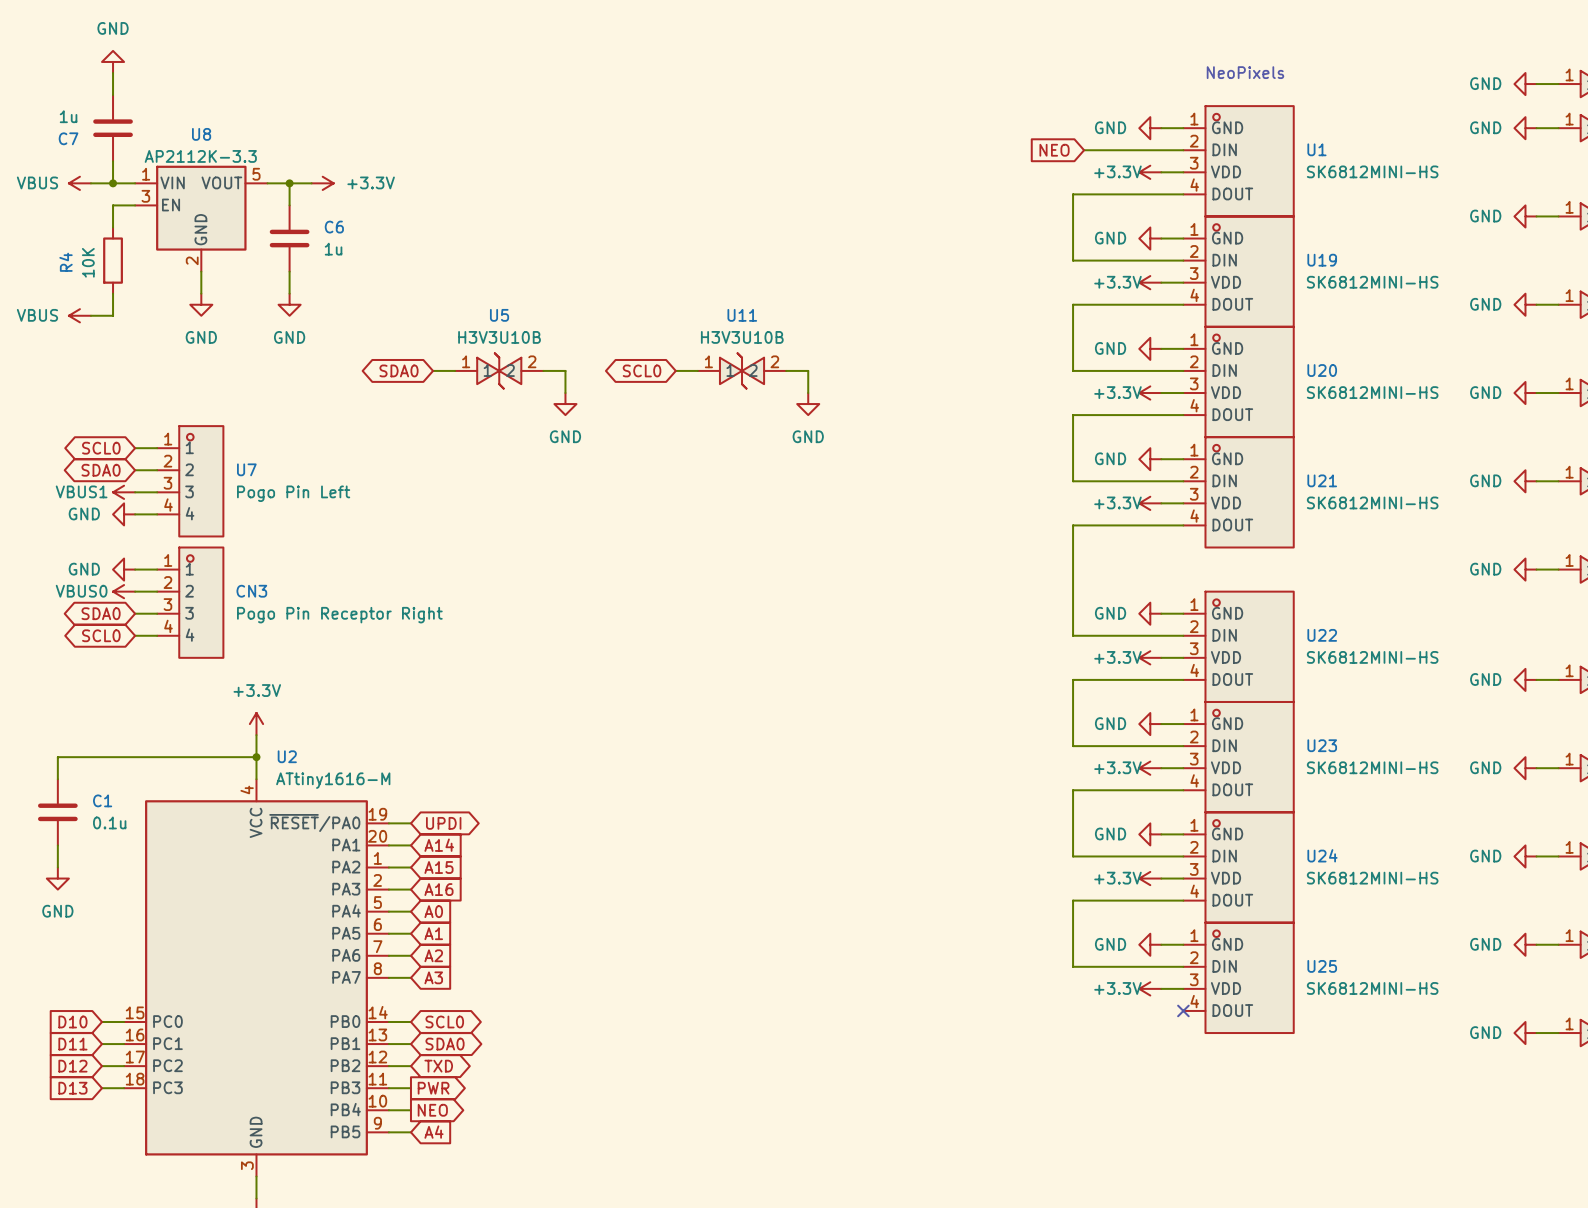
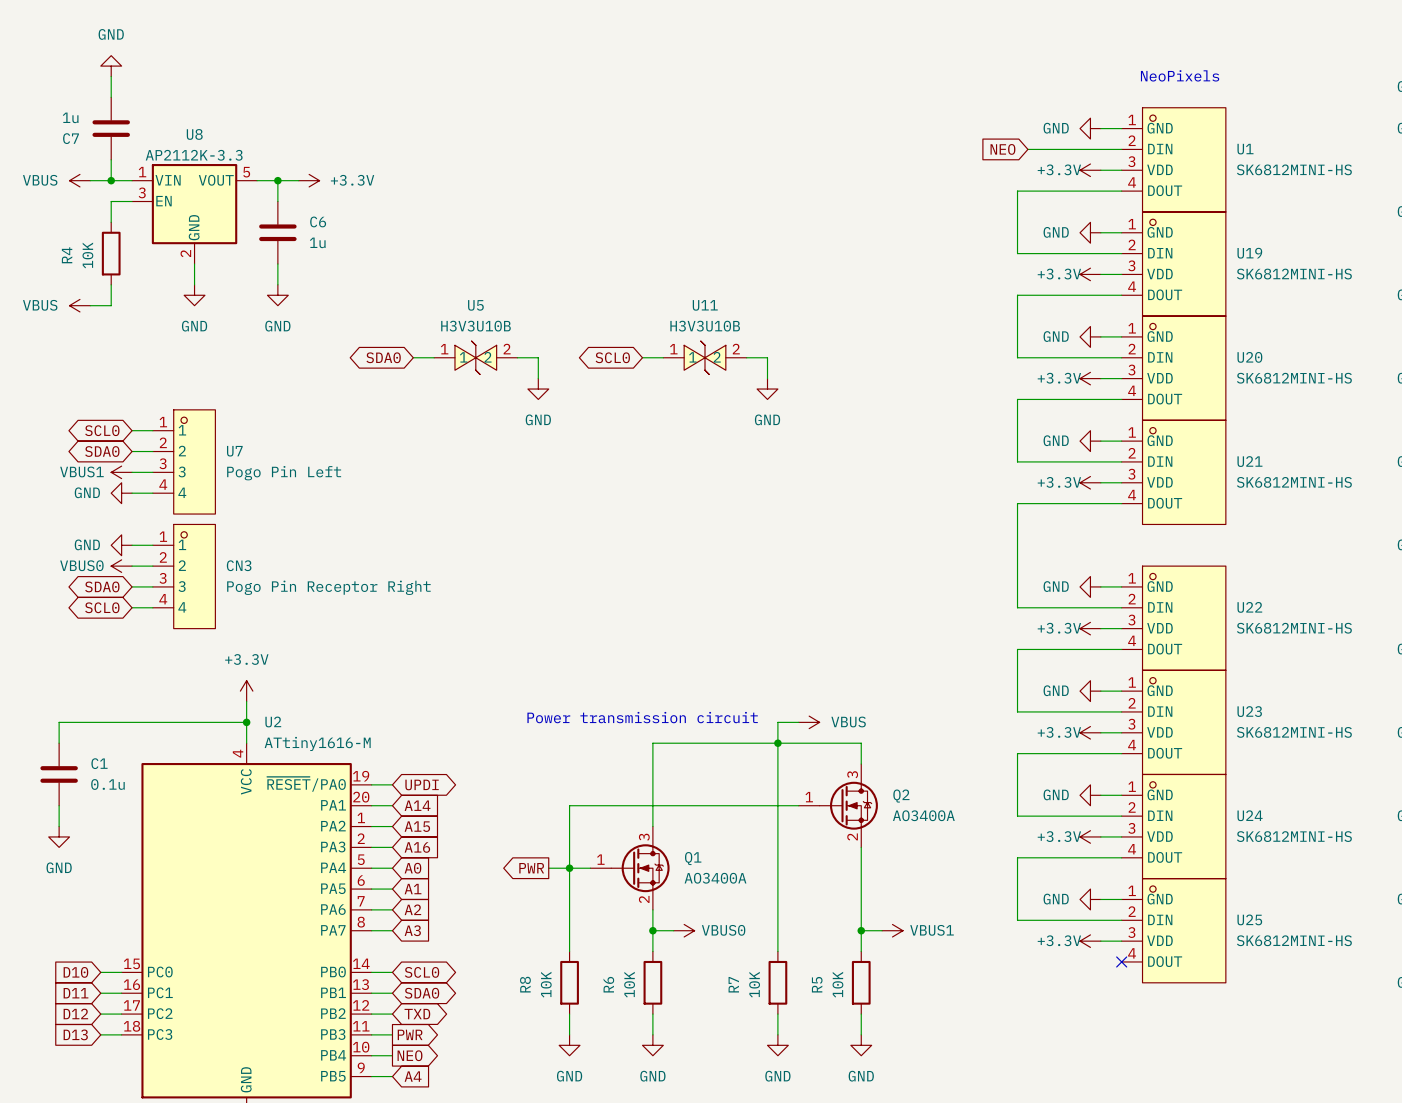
text: none -> Power transmission circuit (642, 717)
wire: none -> (798, 722) (777, 722) (777, 951)
power symbol: none -> VBUS (809, 722)
junction: none -> (777, 743)
wire: none -> (861, 764) (861, 743) (652, 743) (652, 826)
wire: none -> (798, 805) (569, 805) (569, 951)
Q2: none -> AO3400A (838, 805)
wire: none -> (861, 847) (861, 951)
global label: none -> PWR (531, 868)
wire: none -> (548, 868) (590, 868)
junction: none -> (569, 868)
Q1: none -> AO3400A (629, 868)
wire: none -> (652, 909) (652, 951)
wire: none -> (652, 930) (673, 930)
junction: none -> (652, 930)
power symbol: none -> VBUS0 (684, 930)
wire: none -> (861, 930) (882, 930)
junction: none -> (861, 930)
power symbol: none -> VBUS1 (892, 930)
R8: none -> 10K (569, 982)
R6: none -> 10K (652, 982)
R7: none -> 10K (777, 982)
R5: none -> 10K (861, 982)
wire: none -> (569, 1014) (569, 1034)
wire: none -> (652, 1014) (652, 1034)
wire: none -> (777, 1014) (777, 1034)
wire: none -> (861, 1014) (861, 1034)
power symbol: none -> GND (569, 1045)
power symbol: none -> GND (652, 1045)
power symbol: none -> GND (777, 1045)
power symbol: none -> GND (861, 1045)

